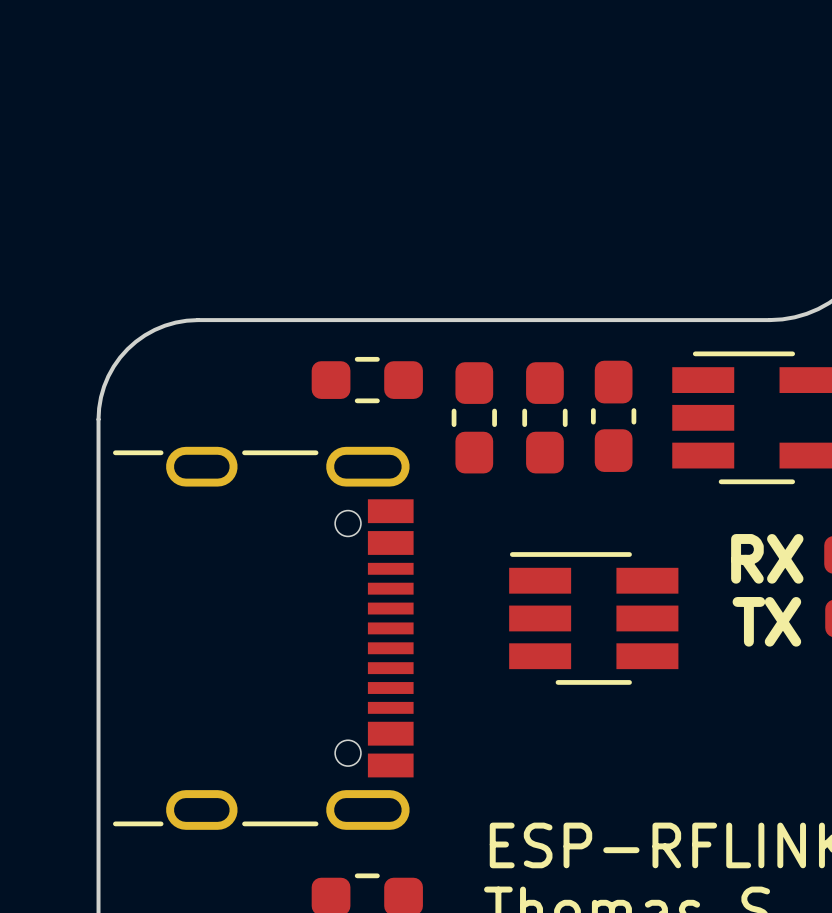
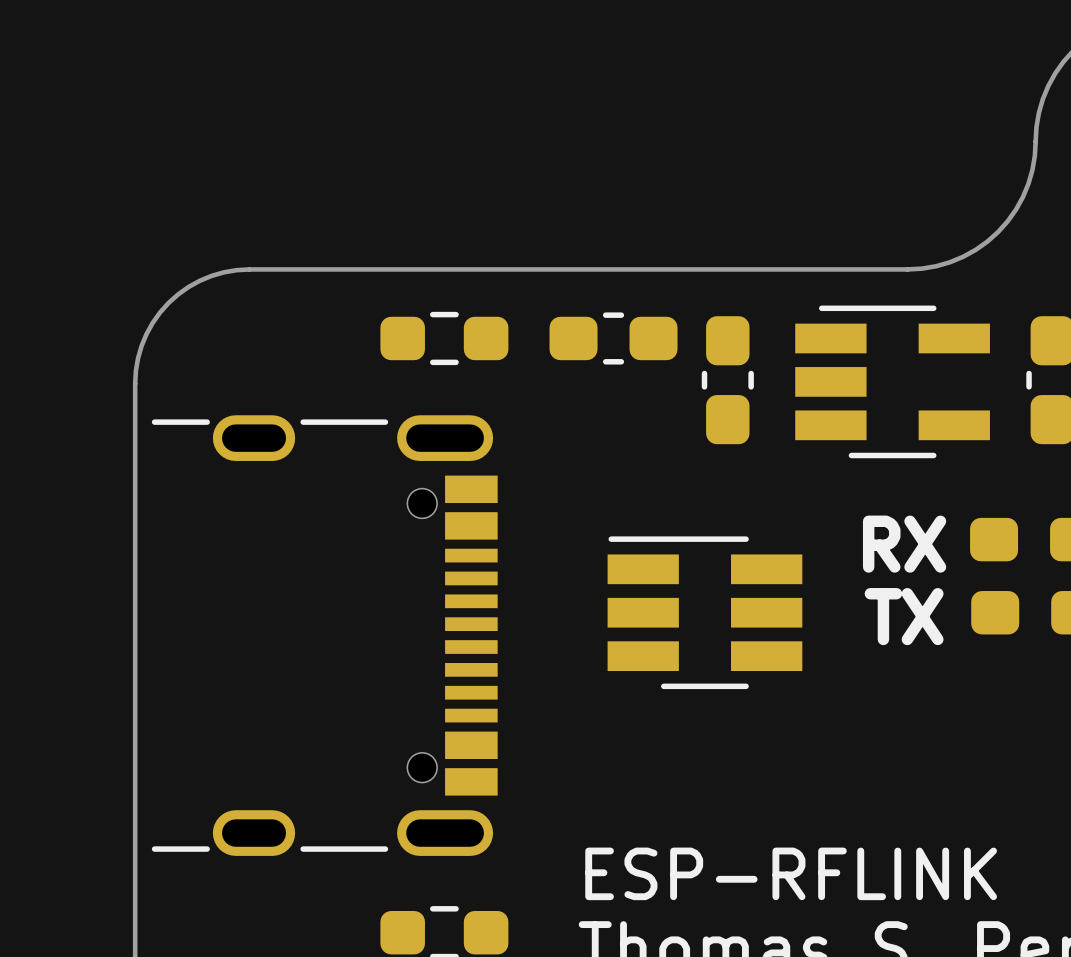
part: none -> (613, 338)
part: (474, 417) -> none
part: (544, 417) -> none

